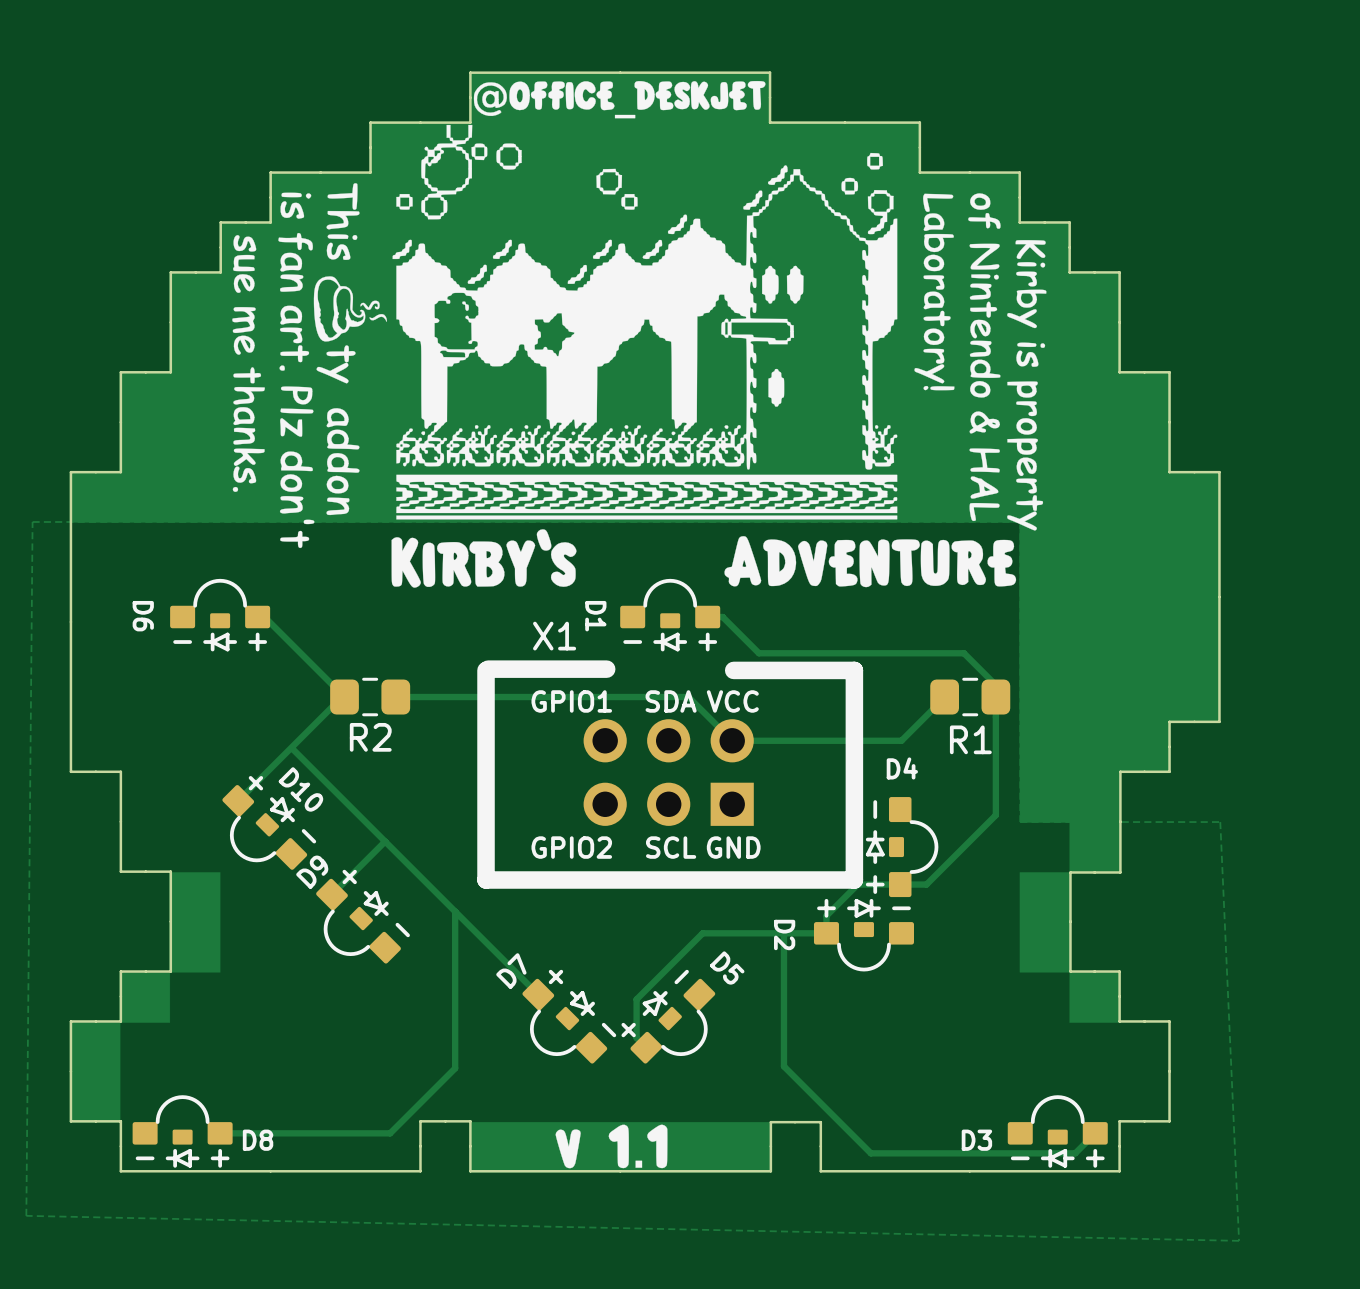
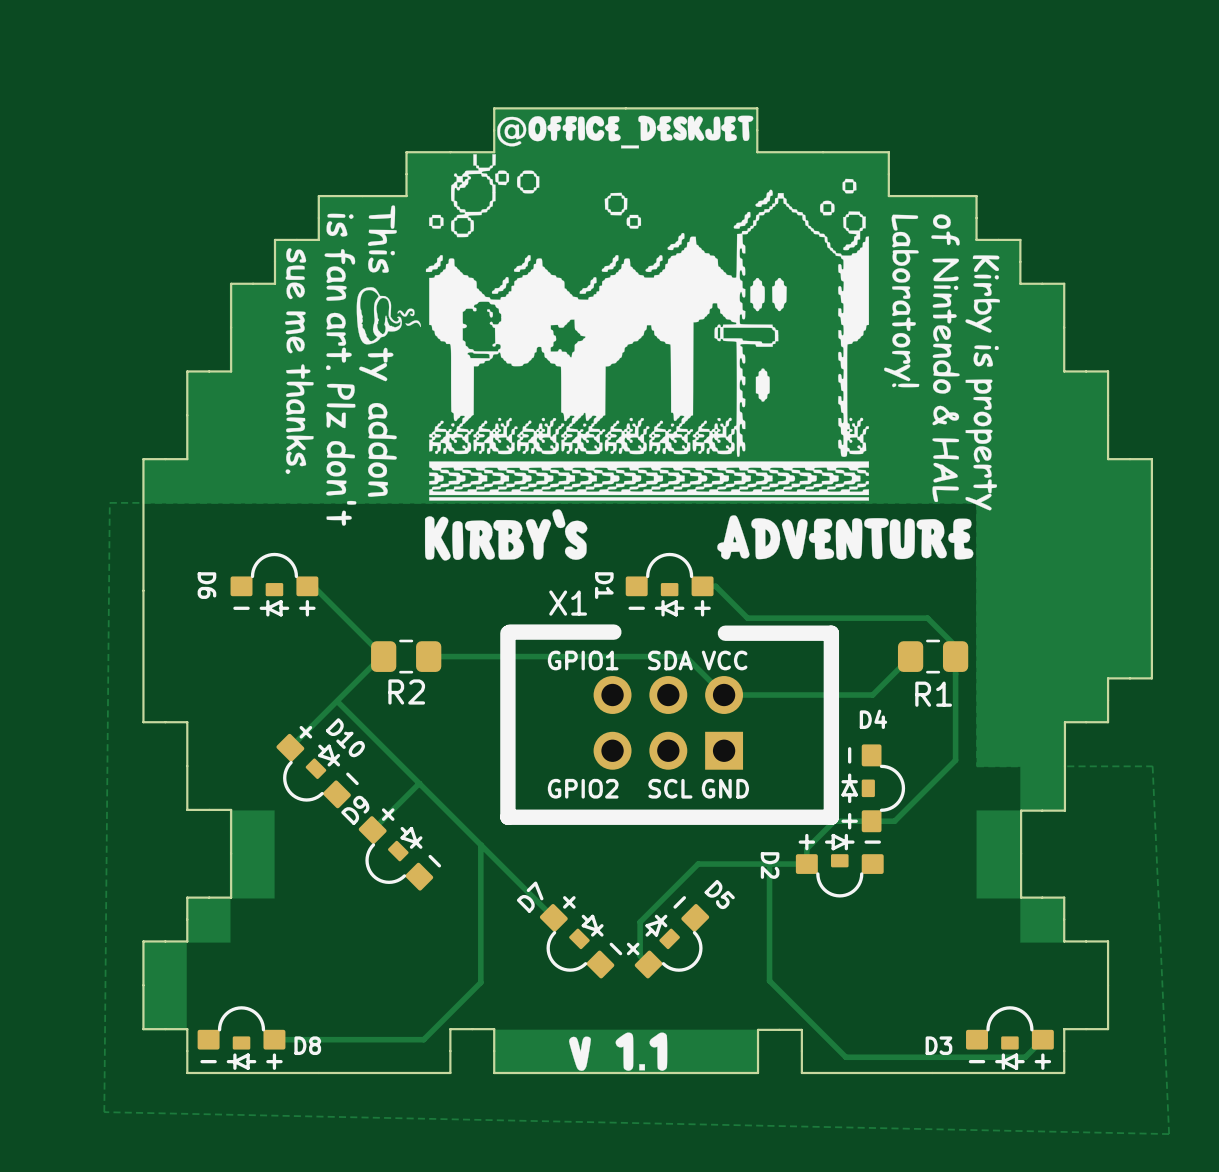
drawing shape: [232, 80, 1047, 1169] -> [285, 115, 1000, 1071]

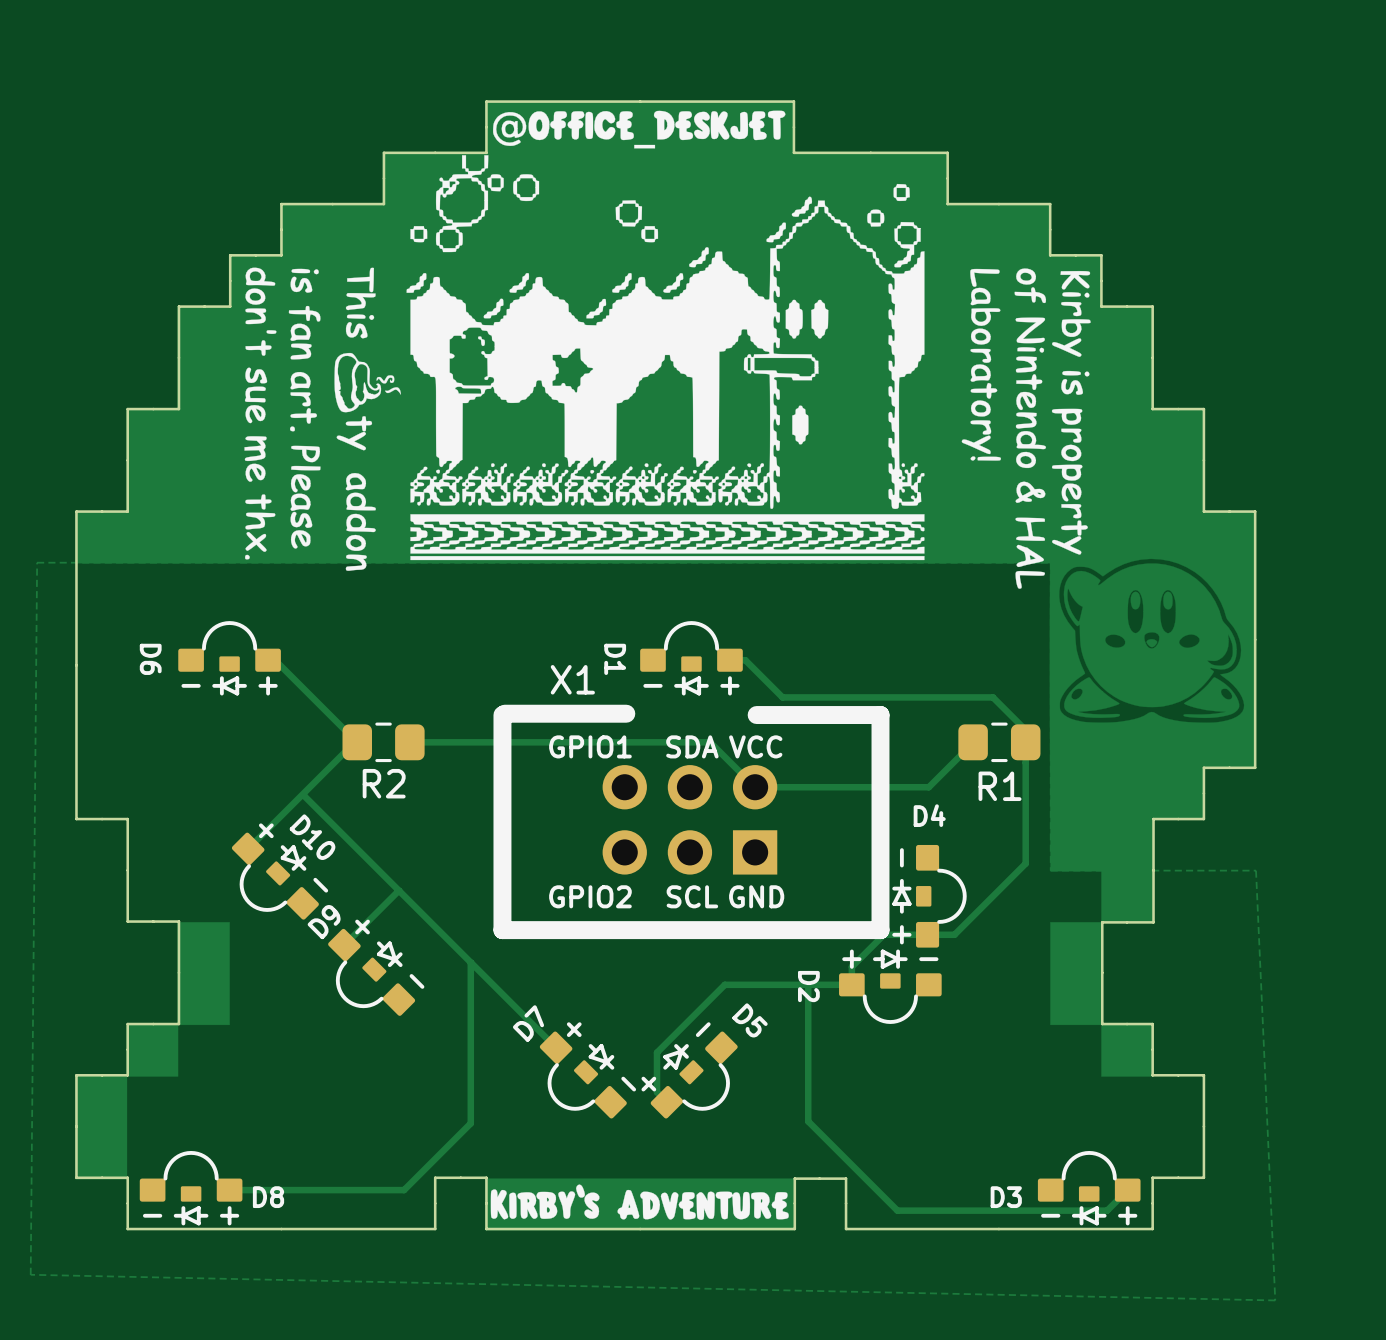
drawing shape: [142, 107, 1153, 1075] -> [75, 100, 1256, 1231]
drawing: [285, 115, 1000, 1071] -> none
drawing: none -> [244, 110, 1091, 1220]

